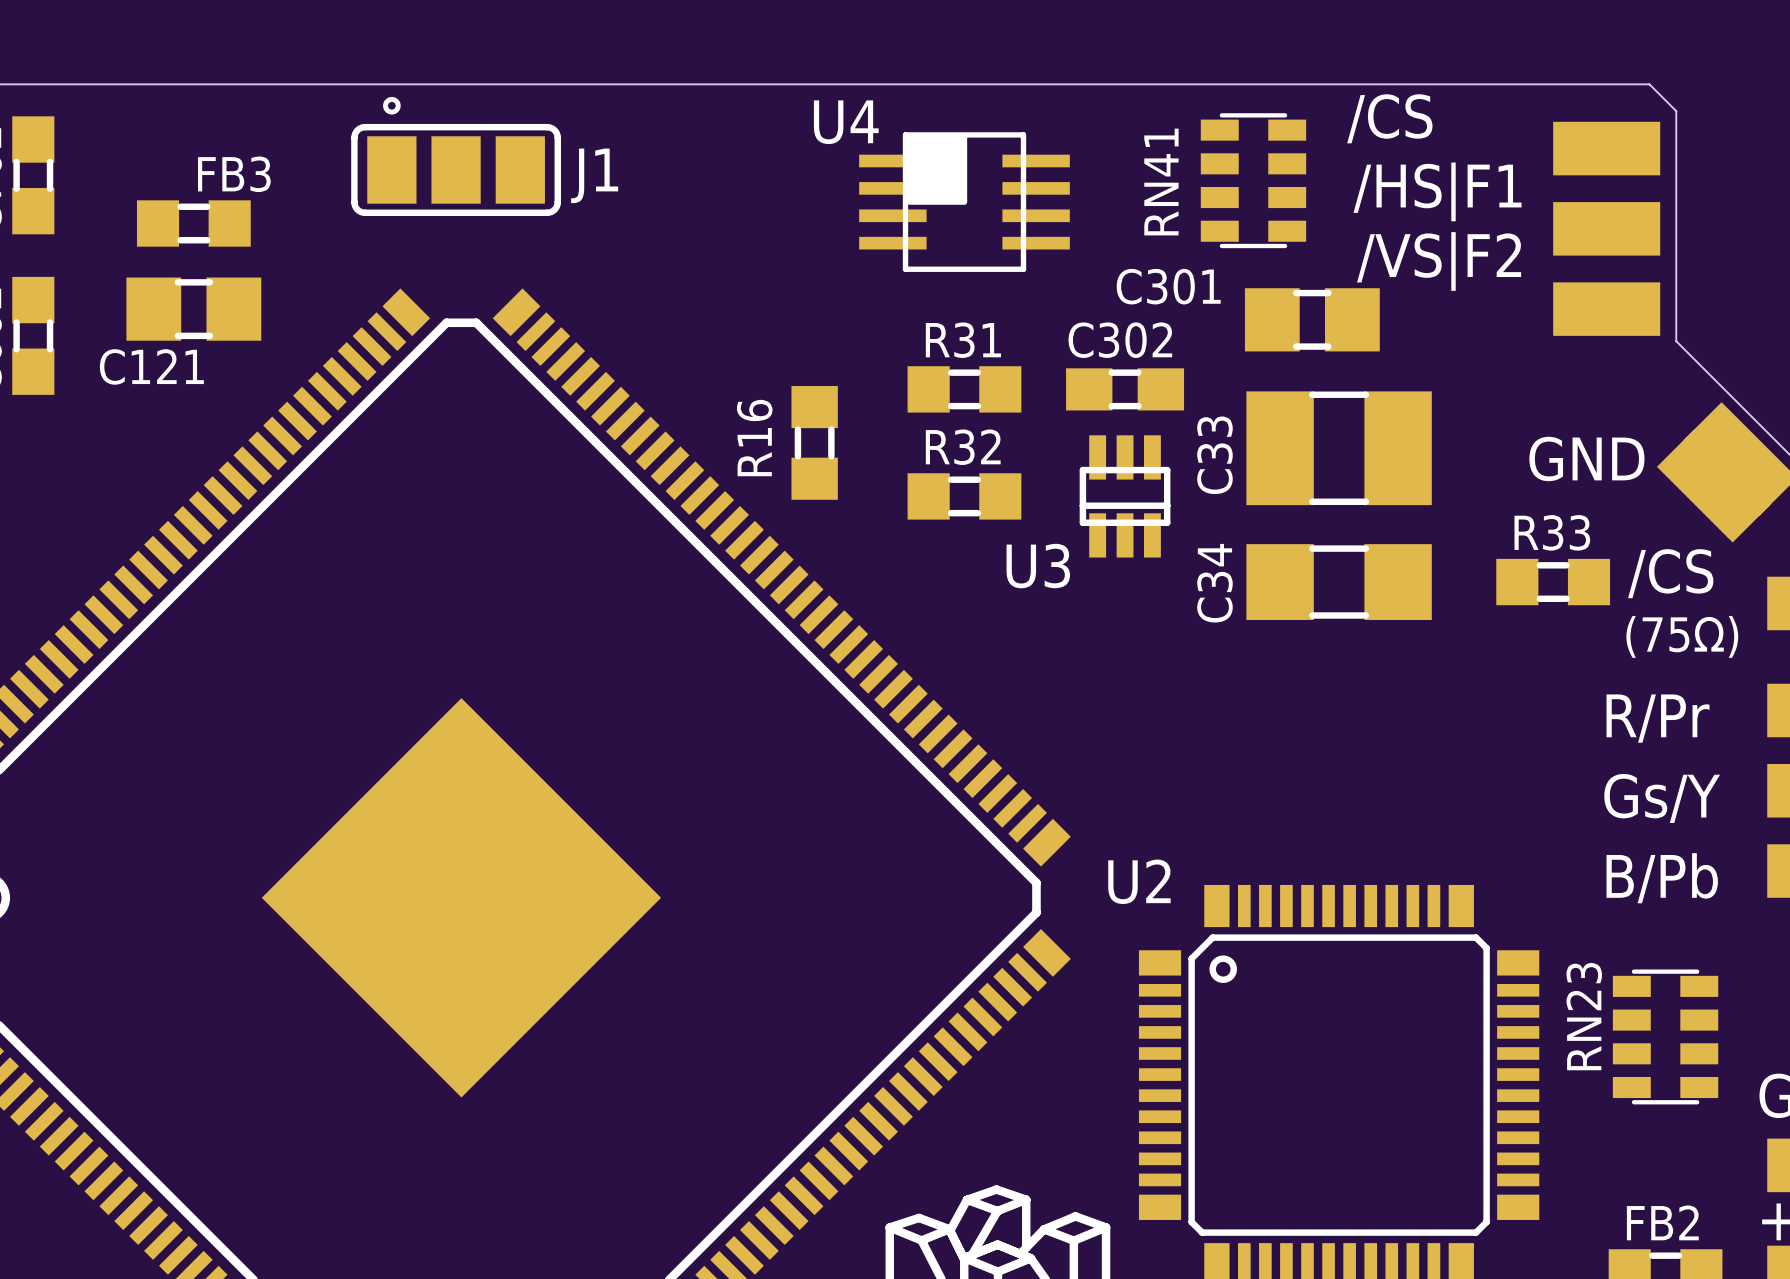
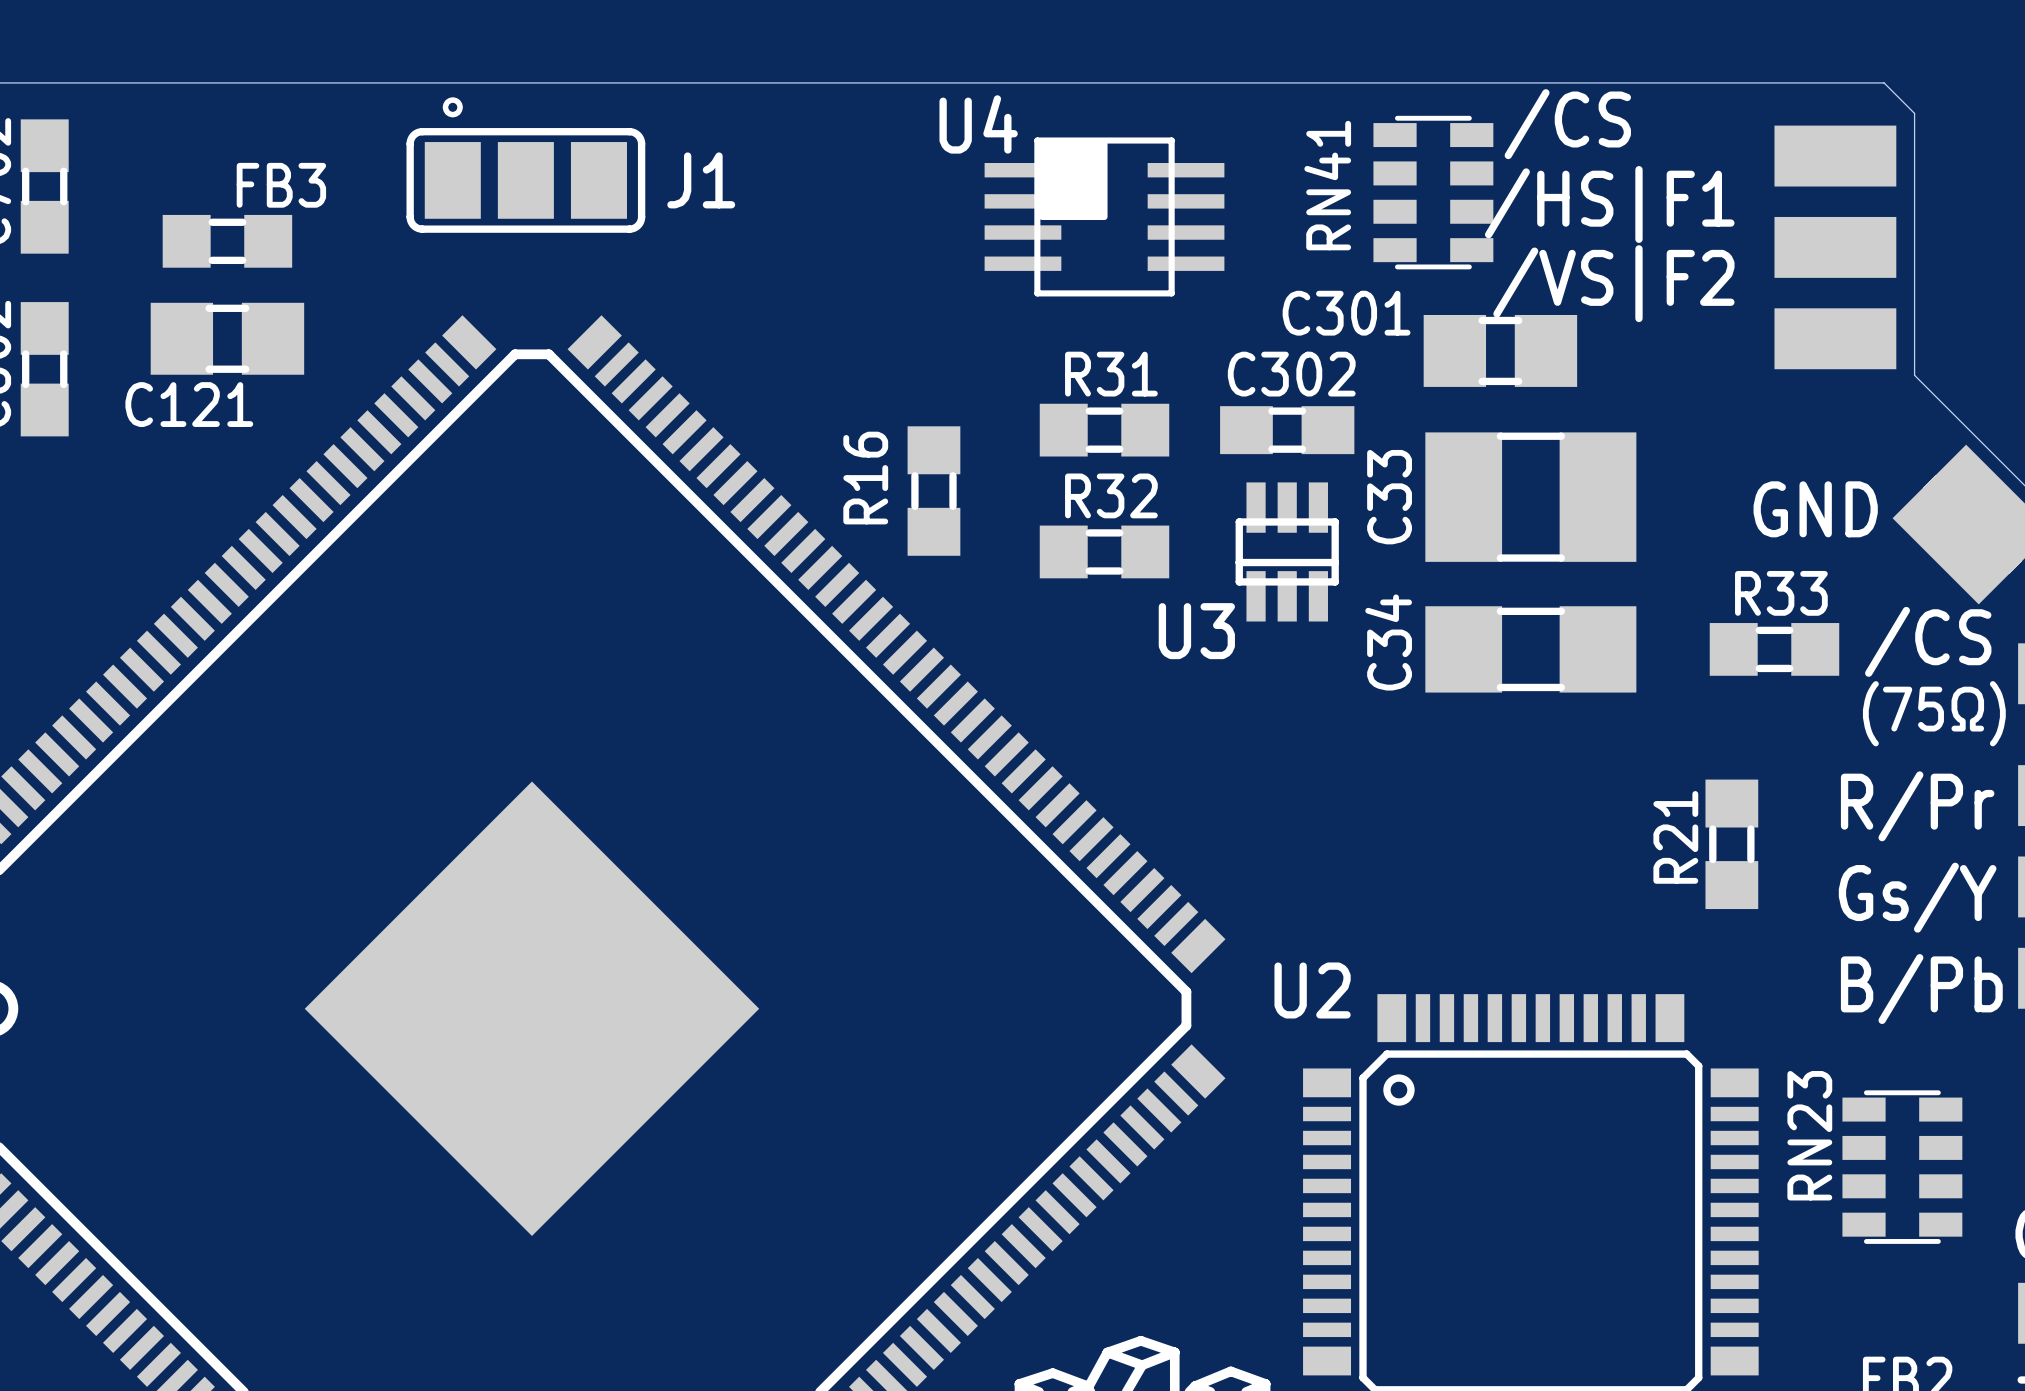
part: none -> (1731, 844)
text: none -> R21 (1675, 837)

